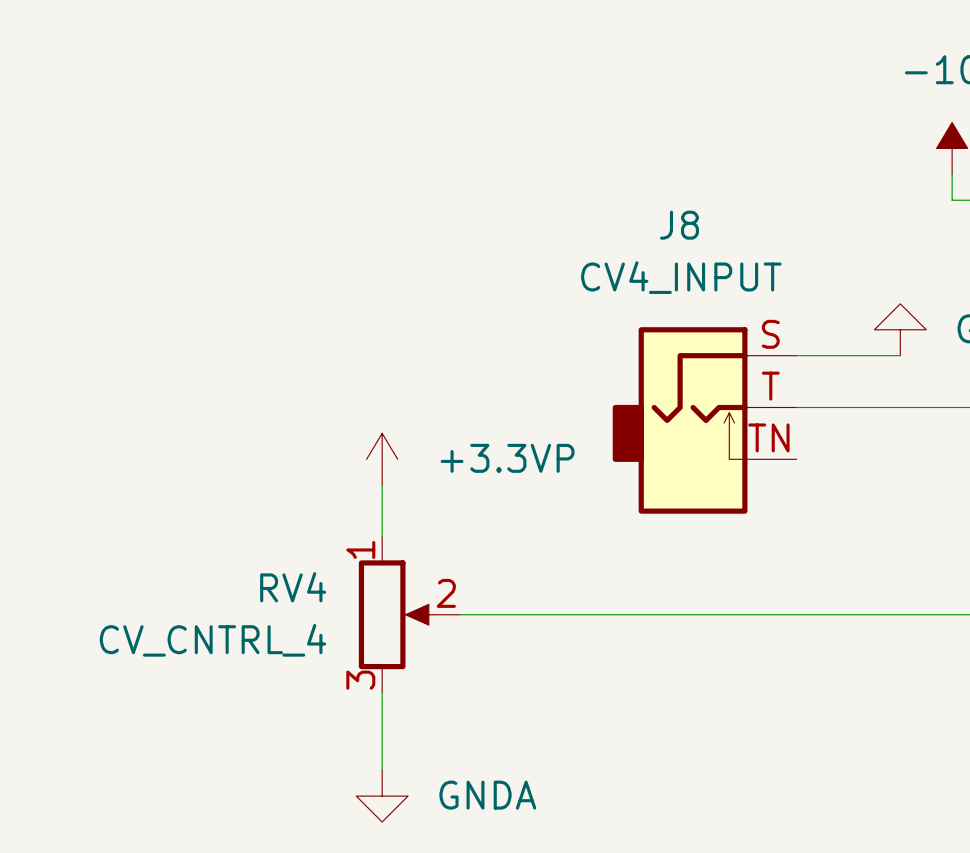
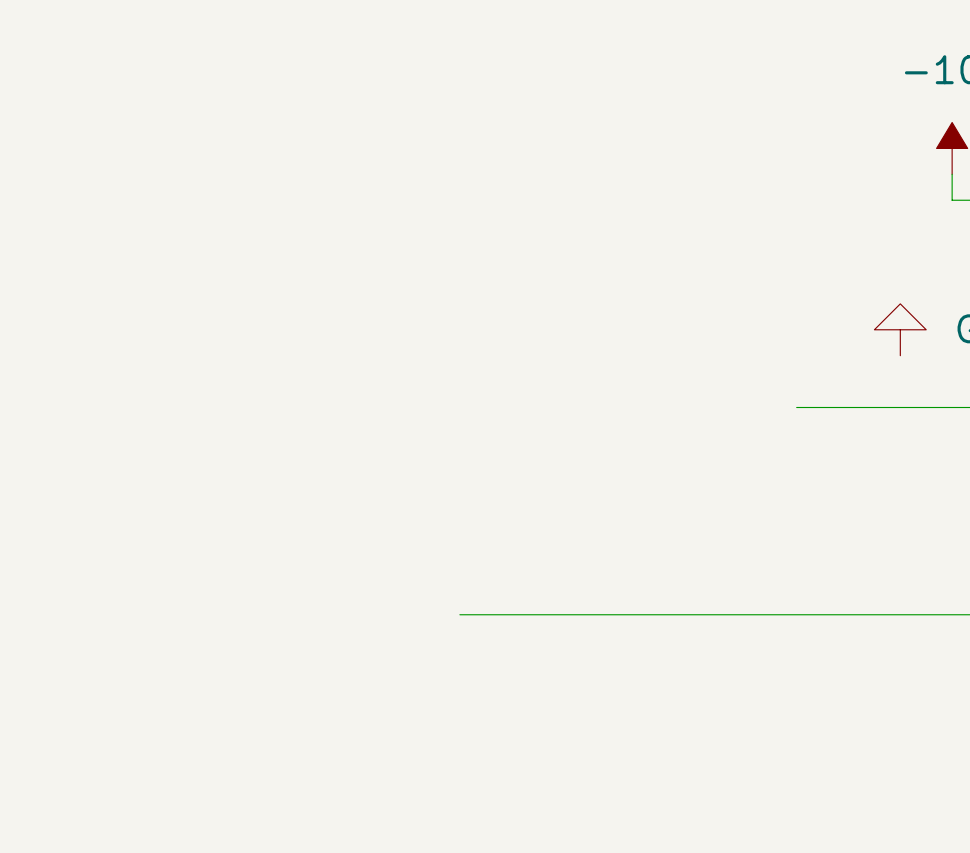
wire: (796, 355) (900, 355) -> none
J8: CV4_INPUT (704, 420) -> none
power symbol: +3.3VP (382, 459) -> none
wire: (382, 485) (382, 537) -> none
RV4: CV_CNTRL_4 (409, 614) -> none
wire: (382, 692) (382, 770) -> none
power symbol: GNDA (382, 796) -> none

